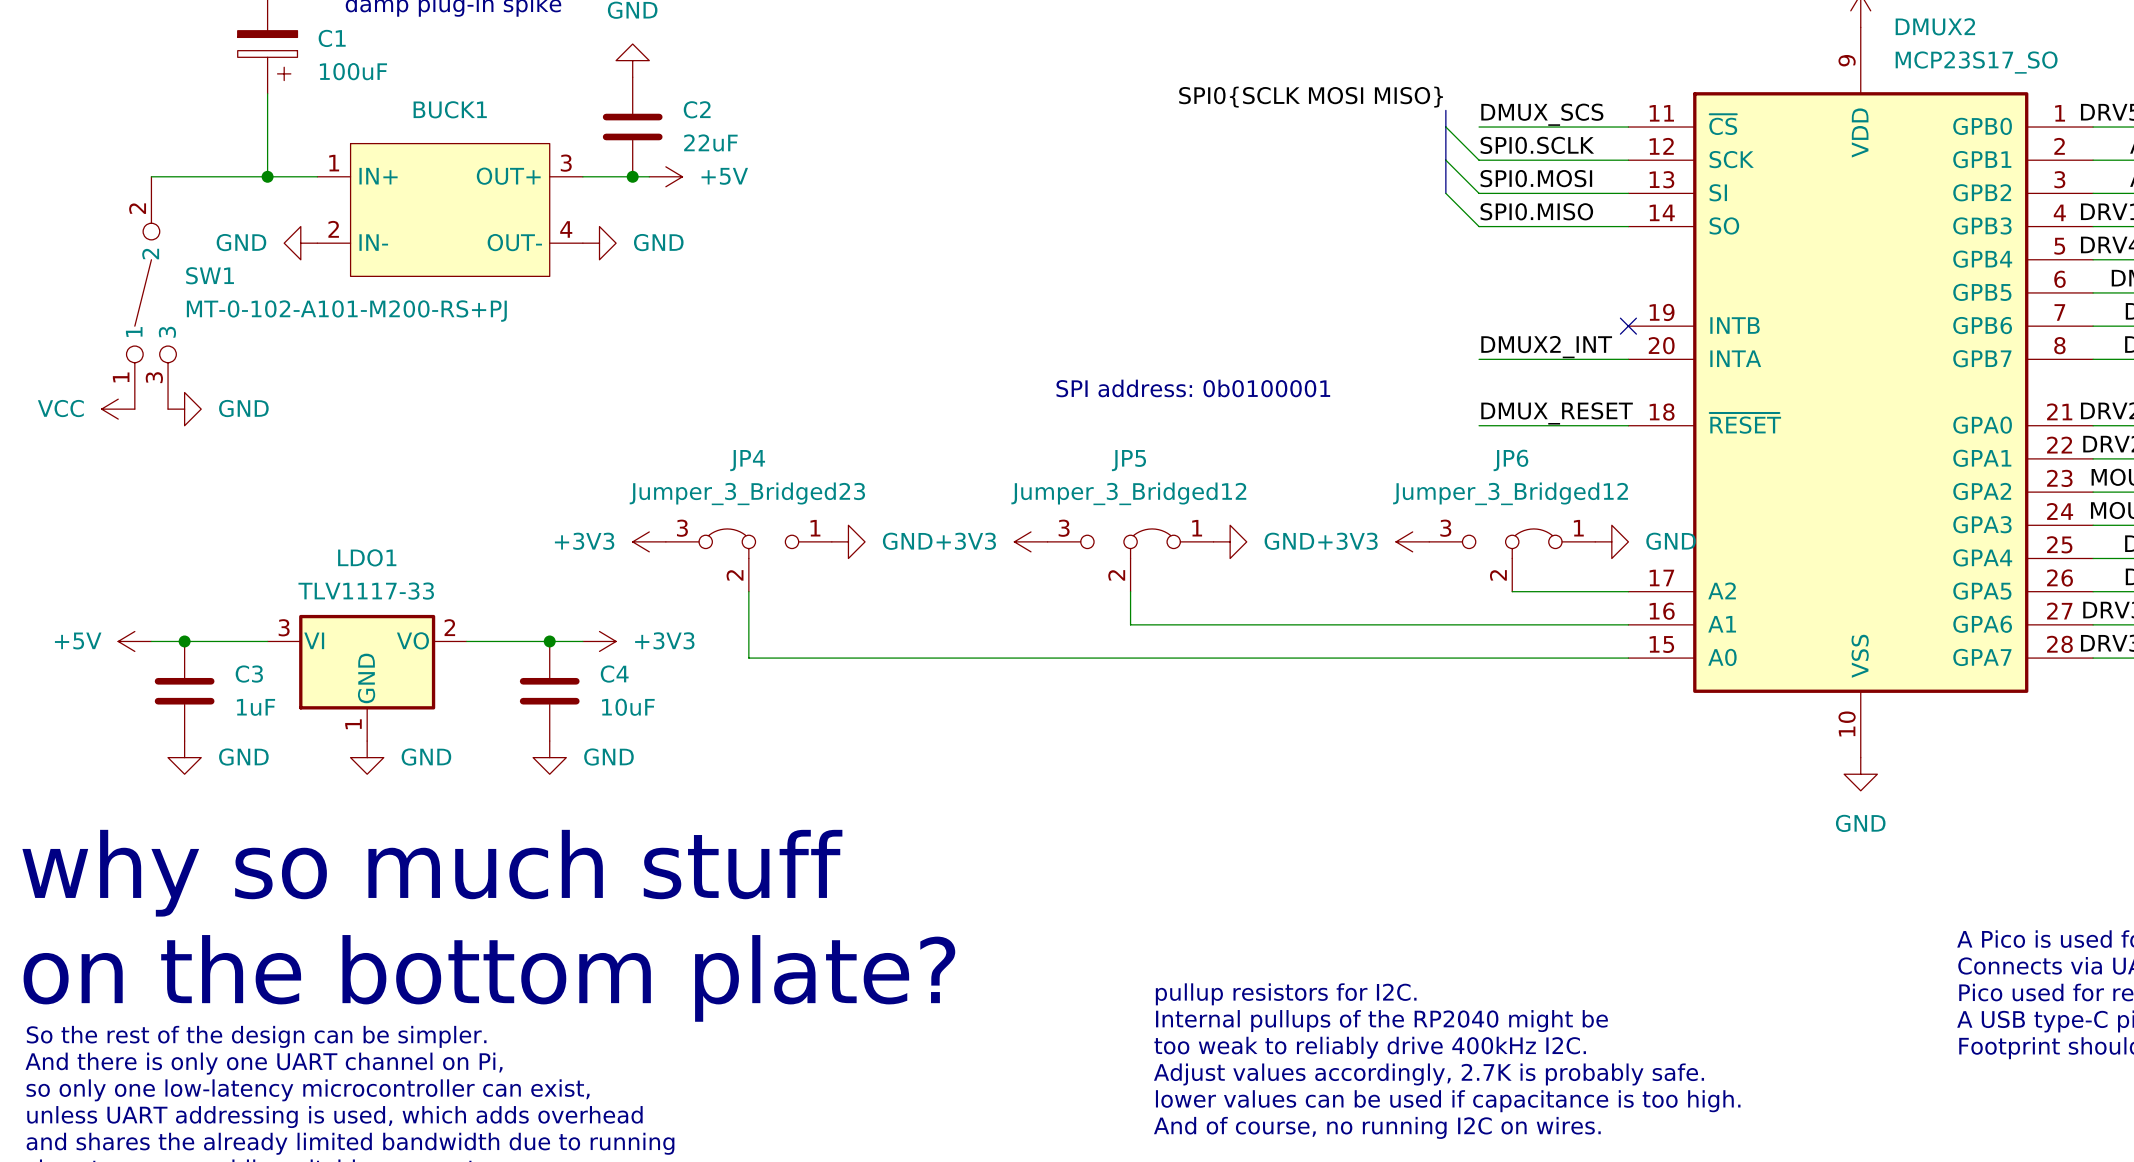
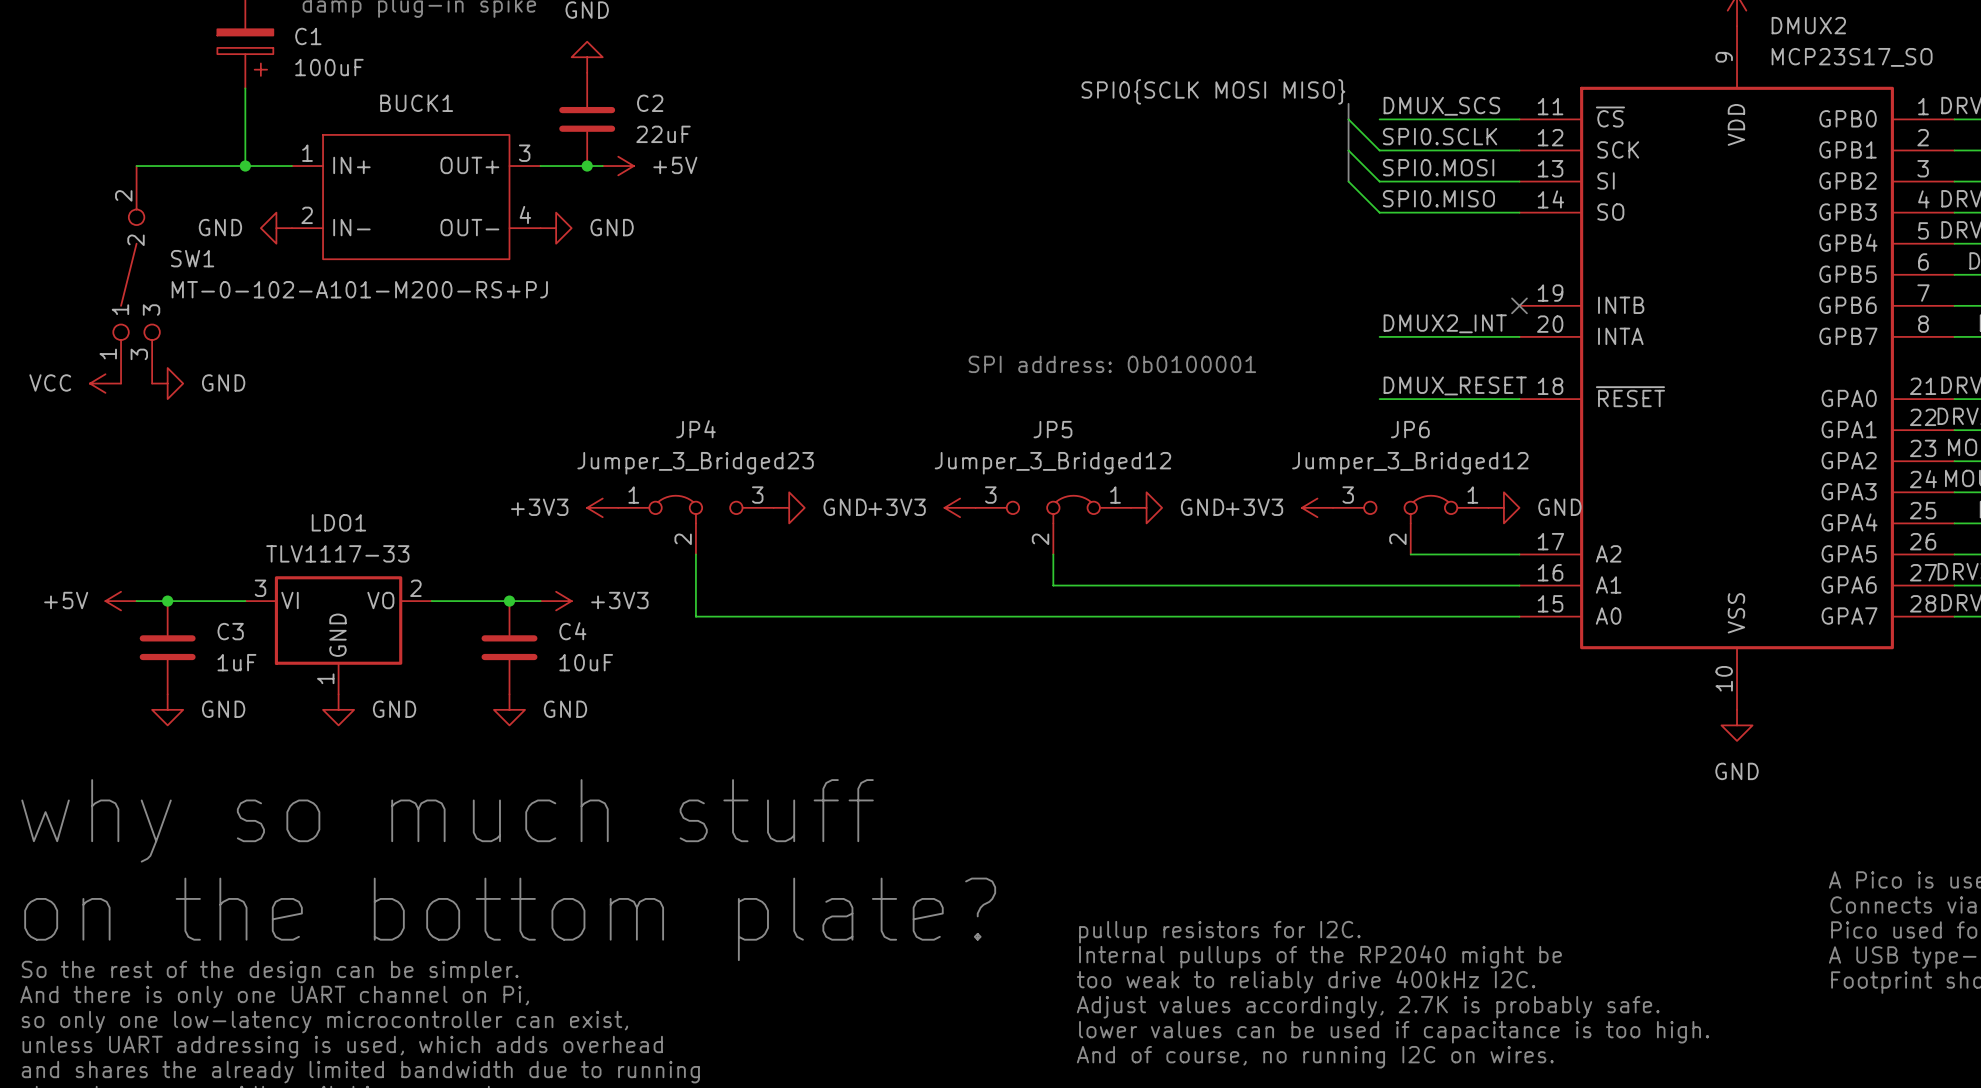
JP4 pin number: 3 (682, 528) -> 1 (633, 495)
JP4 pin number: 1 (815, 528) -> 3 (757, 495)

